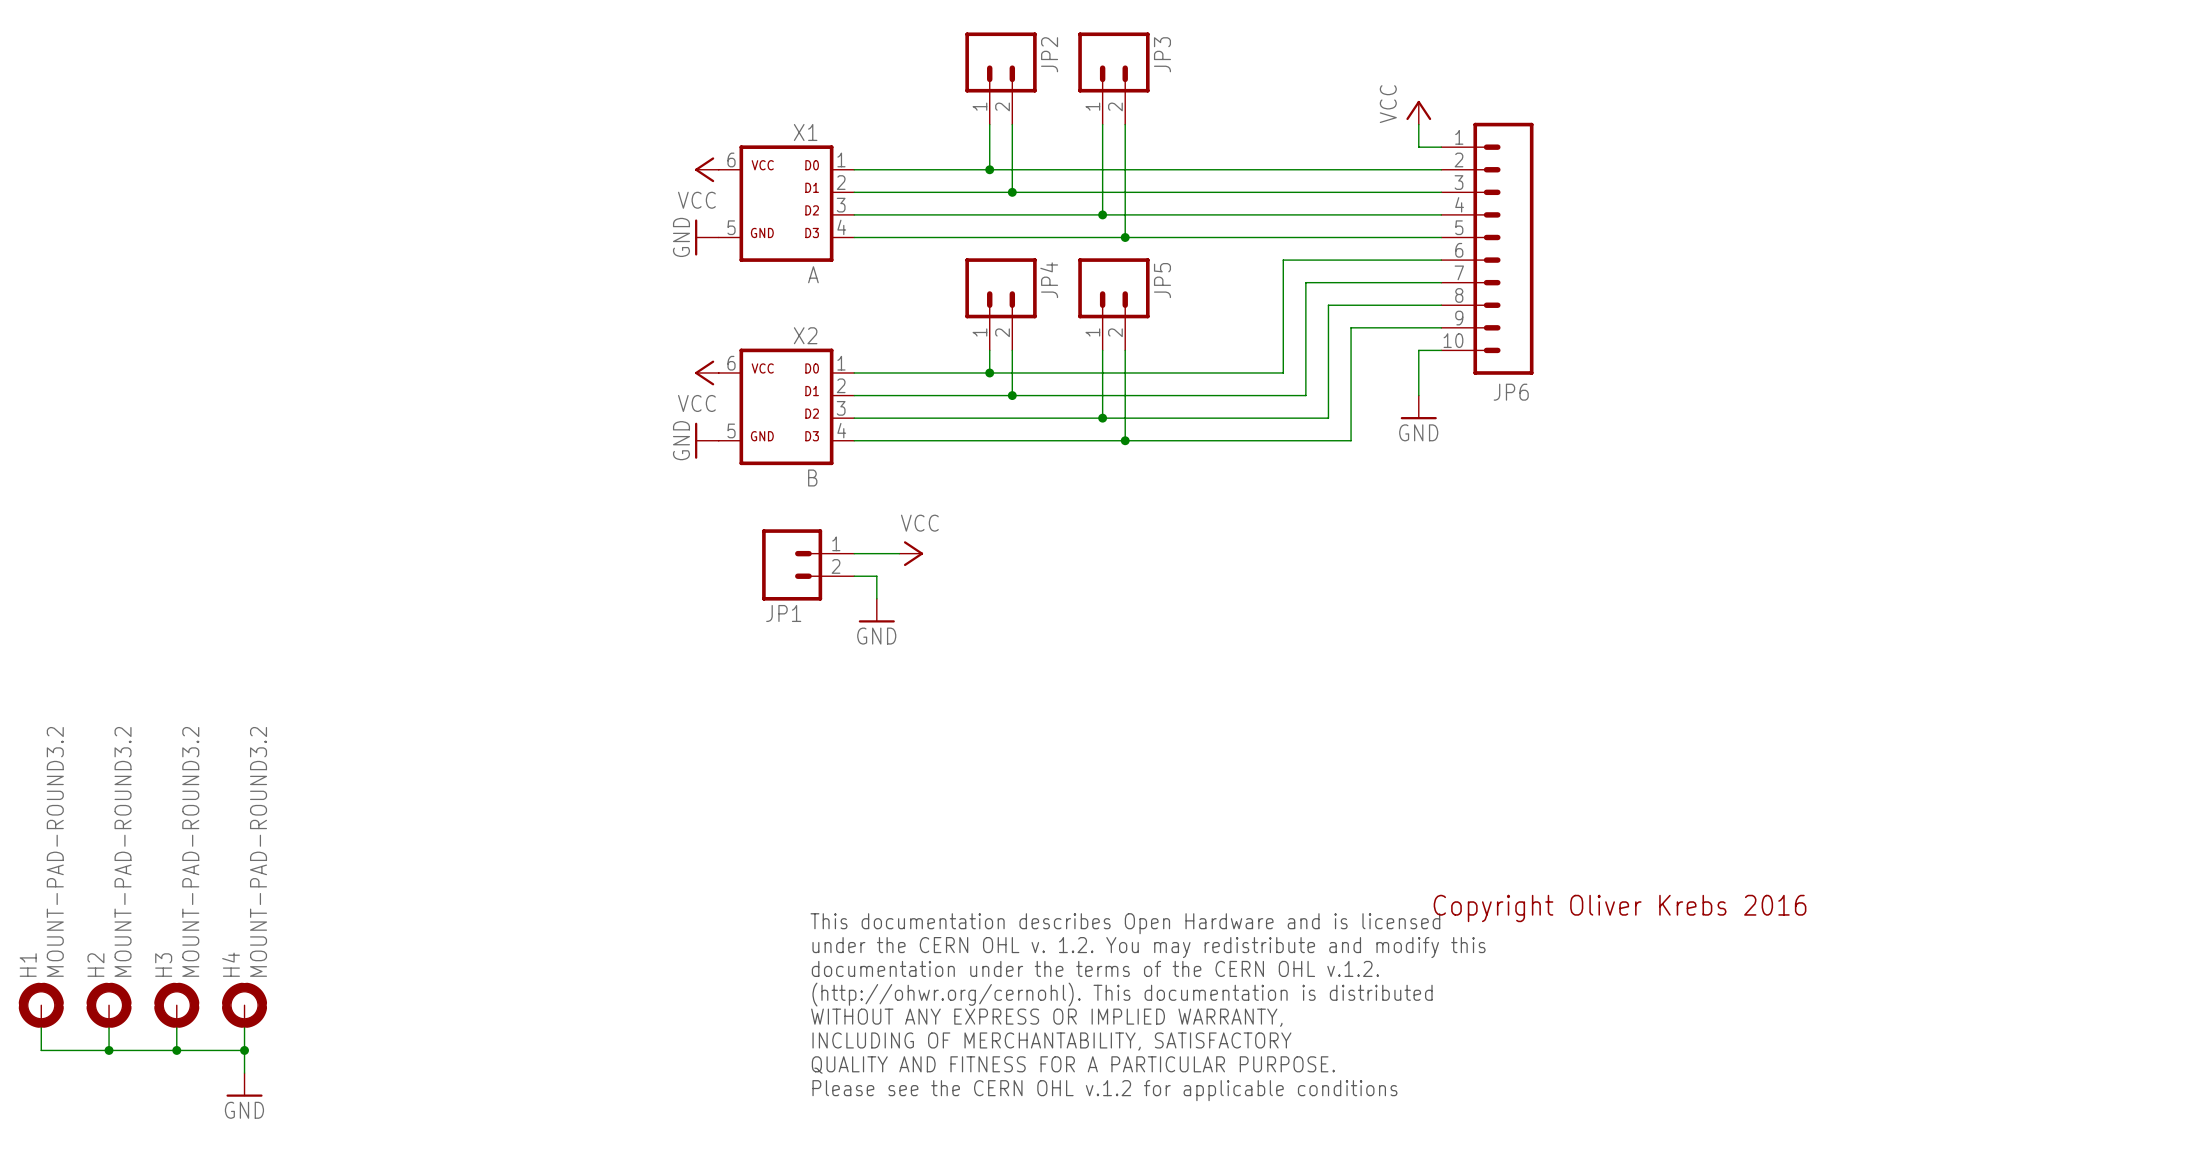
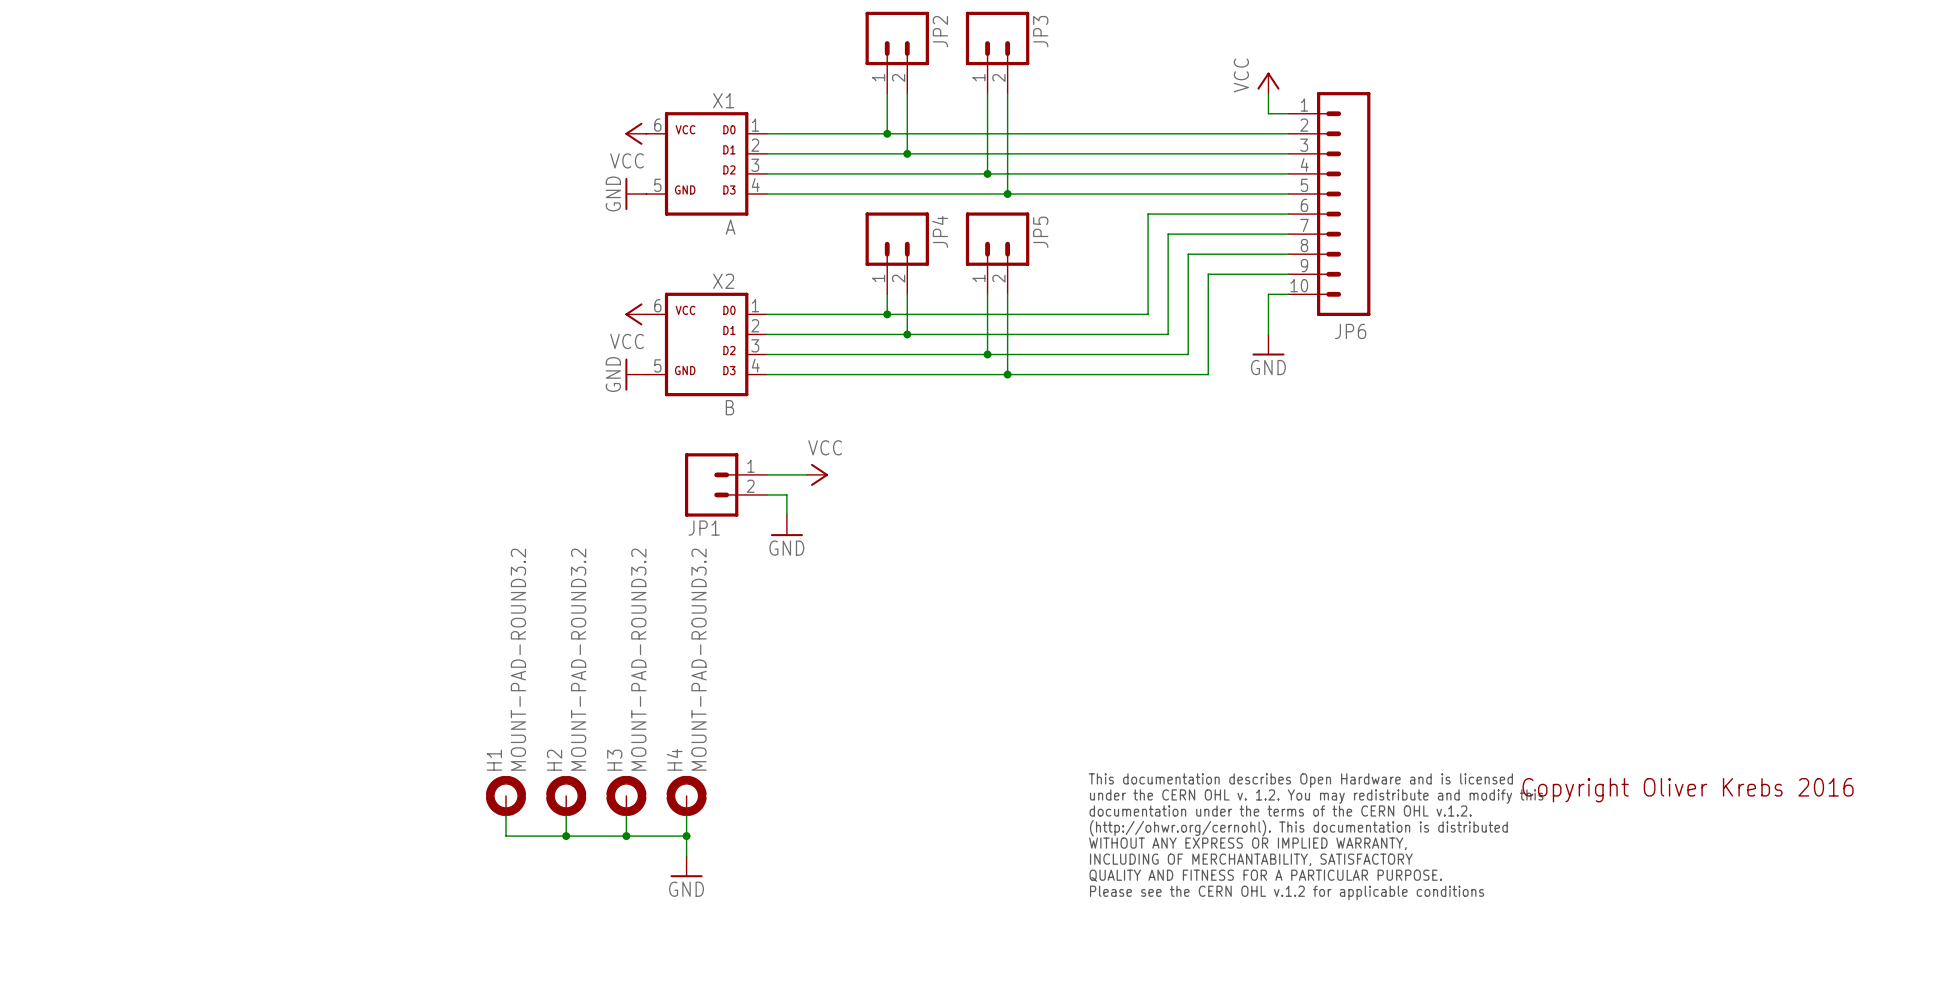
text: none -> This documentation describes Open Hardware and is licensed (1300, 780)
text: Copyright Oliver Krebs 2016 (1620, 908) -> none
text: none -> Copyright Oliver Krebs 2016 (1688, 790)
text: none -> under the CERN OHL v. 1.2. You may redistribute and modify this (1316, 796)
text: This documentation describes Open Hardware and is licensed (1125, 923) -> none
text: none -> documentation under the terms of the CERN OHL v.1.2. (1280, 810)
wire: none -> (505, 816) (505, 836) (686, 836)
wire: none -> (566, 816) (566, 836)
wire: none -> (626, 816) (626, 836)
wire: none -> (686, 816) (686, 856)
text: under the CERN OHL v. 1.2. You may redistribute and modify this (1149, 947) -> none
text: none -> (http://ohwr.org/cernohl). This documentation is distributed (1298, 828)
junction: none -> (566, 836)
junction: none -> (626, 836)
junction: none -> (686, 836)
text: documentation under the terms of the CERN OHL v.1.2. (1095, 968) -> none
text: none -> WITHOUT ANY EXPRESS OR IMPLIED WARRANTY, (1247, 843)
text: none -> INCLUDING OF MERCHANTABILITY, SATISFACTORY (1251, 859)
power symbol: none -> GND (686, 866)
text: (http://ohwr.org/cernohl). This documentation is distributed (1122, 994) -> none
text: none -> QUALITY AND FITNESS FOR A PARTICULAR PURPOSE. (1265, 875)
H1 position: (41, 1005) -> (505, 795)
H2 position: (109, 1005) -> (566, 795)
H3 position: (176, 1005) -> (626, 795)
H4 position: (244, 1005) -> (686, 795)
text: WITHOUT ANY EXPRESS OR IMPLIED WARRANTY, (1046, 1017) -> none
text: none -> Please see the CERN OHL v.1.2 for applicable conditions (1287, 892)
wire: (41, 1027) (41, 1050) (244, 1050) -> none
wire: (109, 1027) (109, 1050) -> none
wire: (176, 1027) (176, 1050) -> none
wire: (244, 1027) (244, 1073) -> none
text: INCLUDING OF MERCHANTABILITY, SATISFACTORY (1051, 1041) -> none
junction: (109, 1050) -> none
junction: (176, 1050) -> none
junction: (244, 1050) -> none
text: QUALITY AND FITNESS FOR A PARTICULAR PURPOSE. (1073, 1065) -> none
power symbol: GND (244, 1084) -> none
text: Please see the CERN OHL v.1.2 for applicable conditions (1104, 1090) -> none

